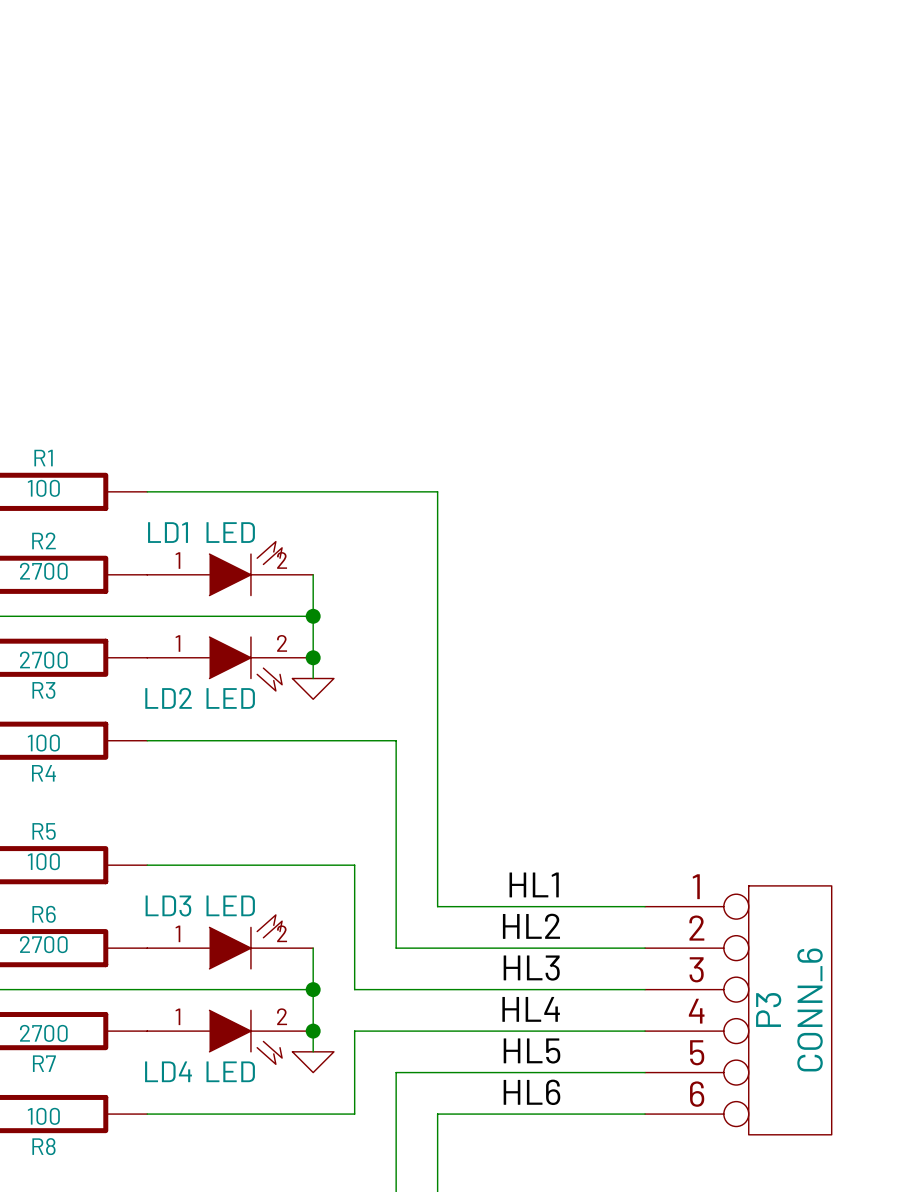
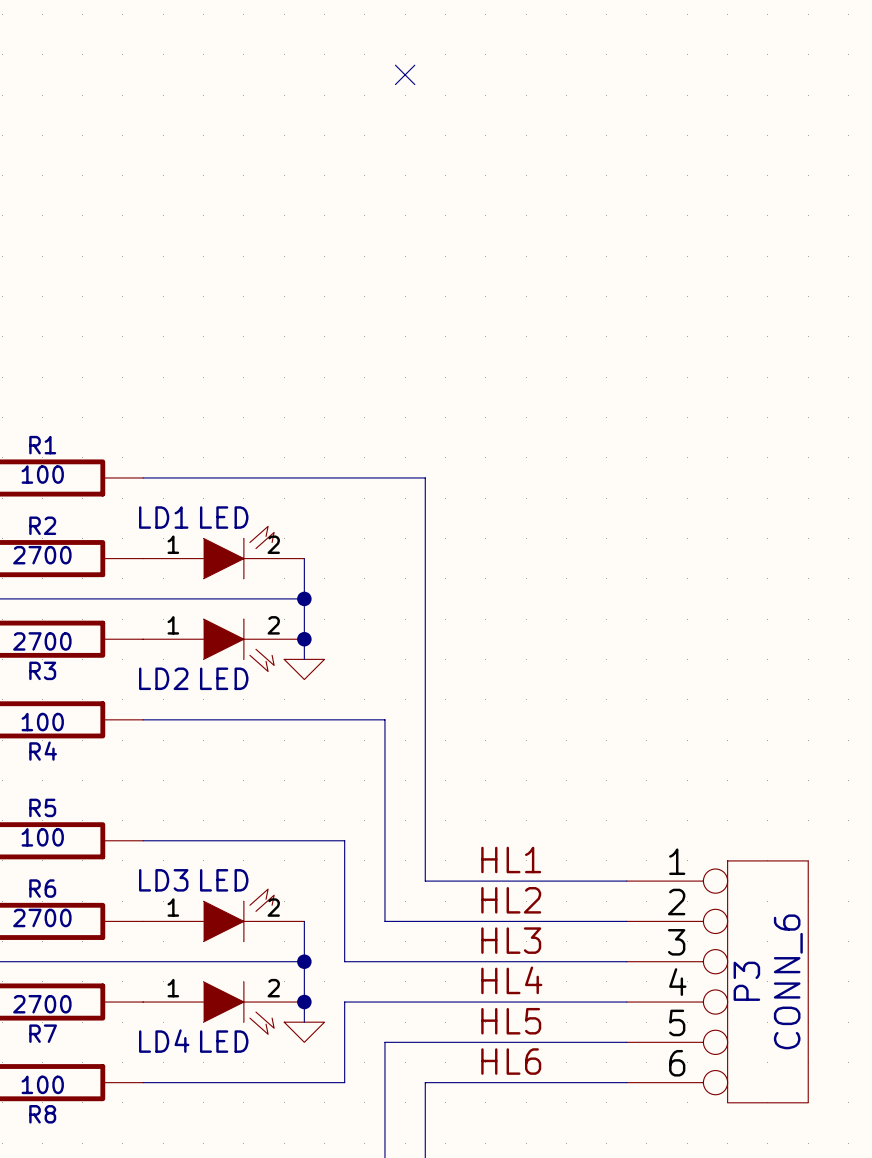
no-connect mark: none -> (405, 74)

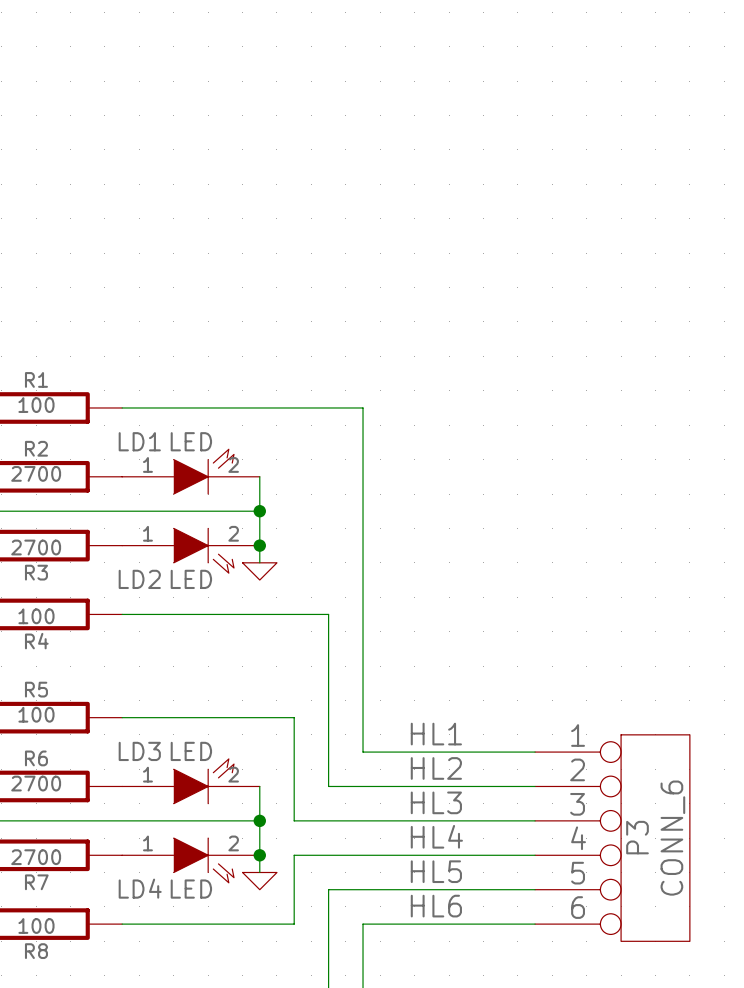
no-connect mark: (405, 74) -> none

